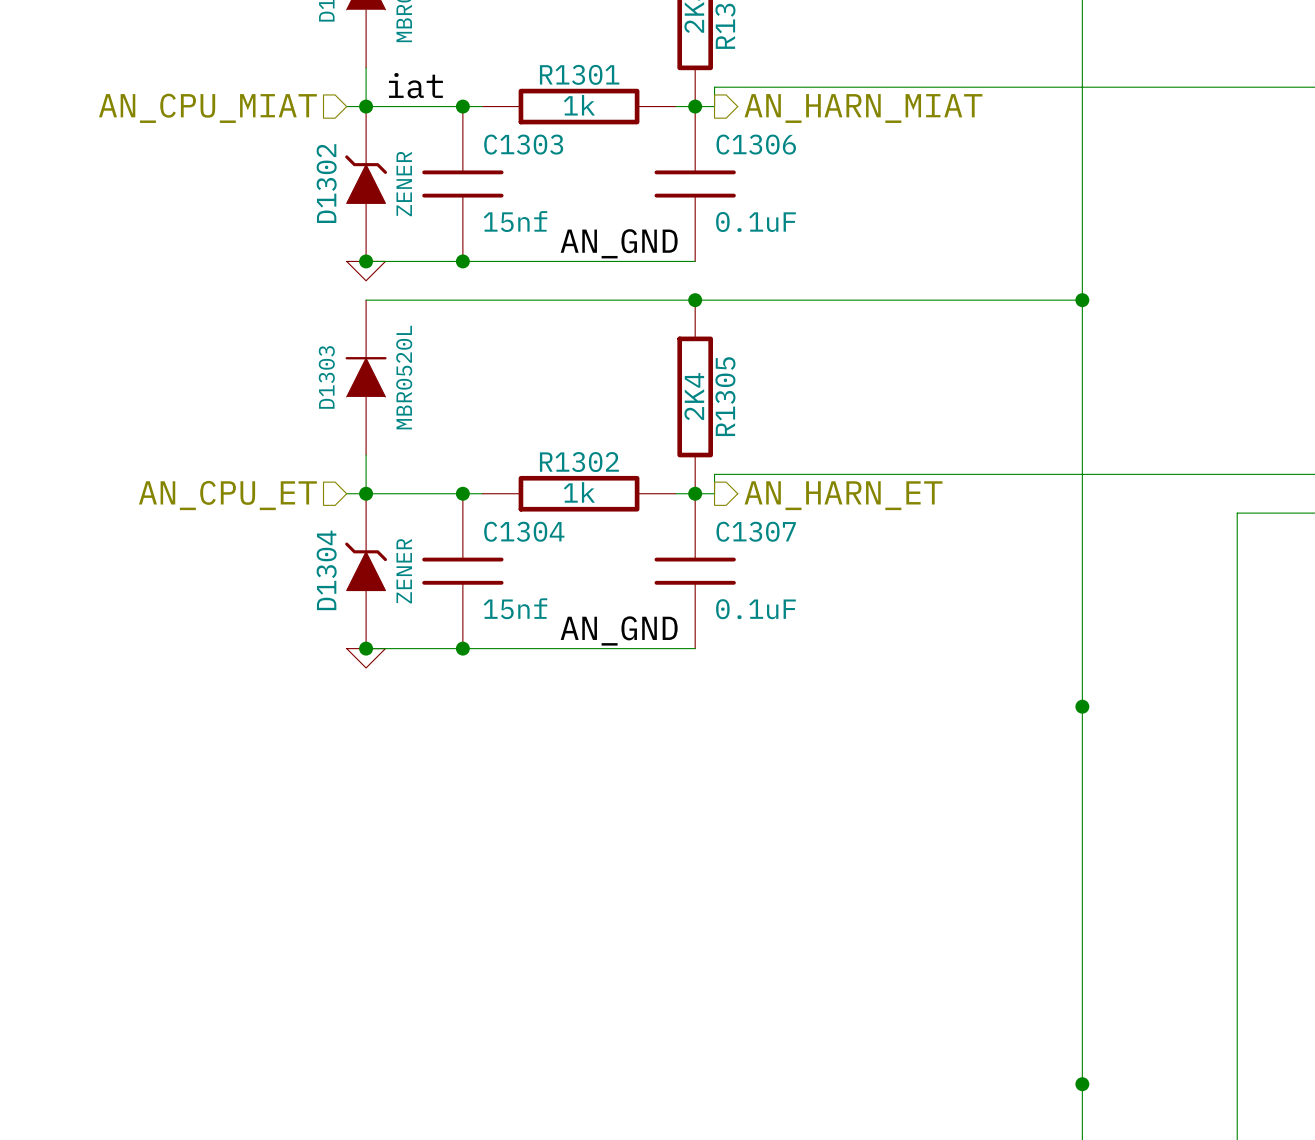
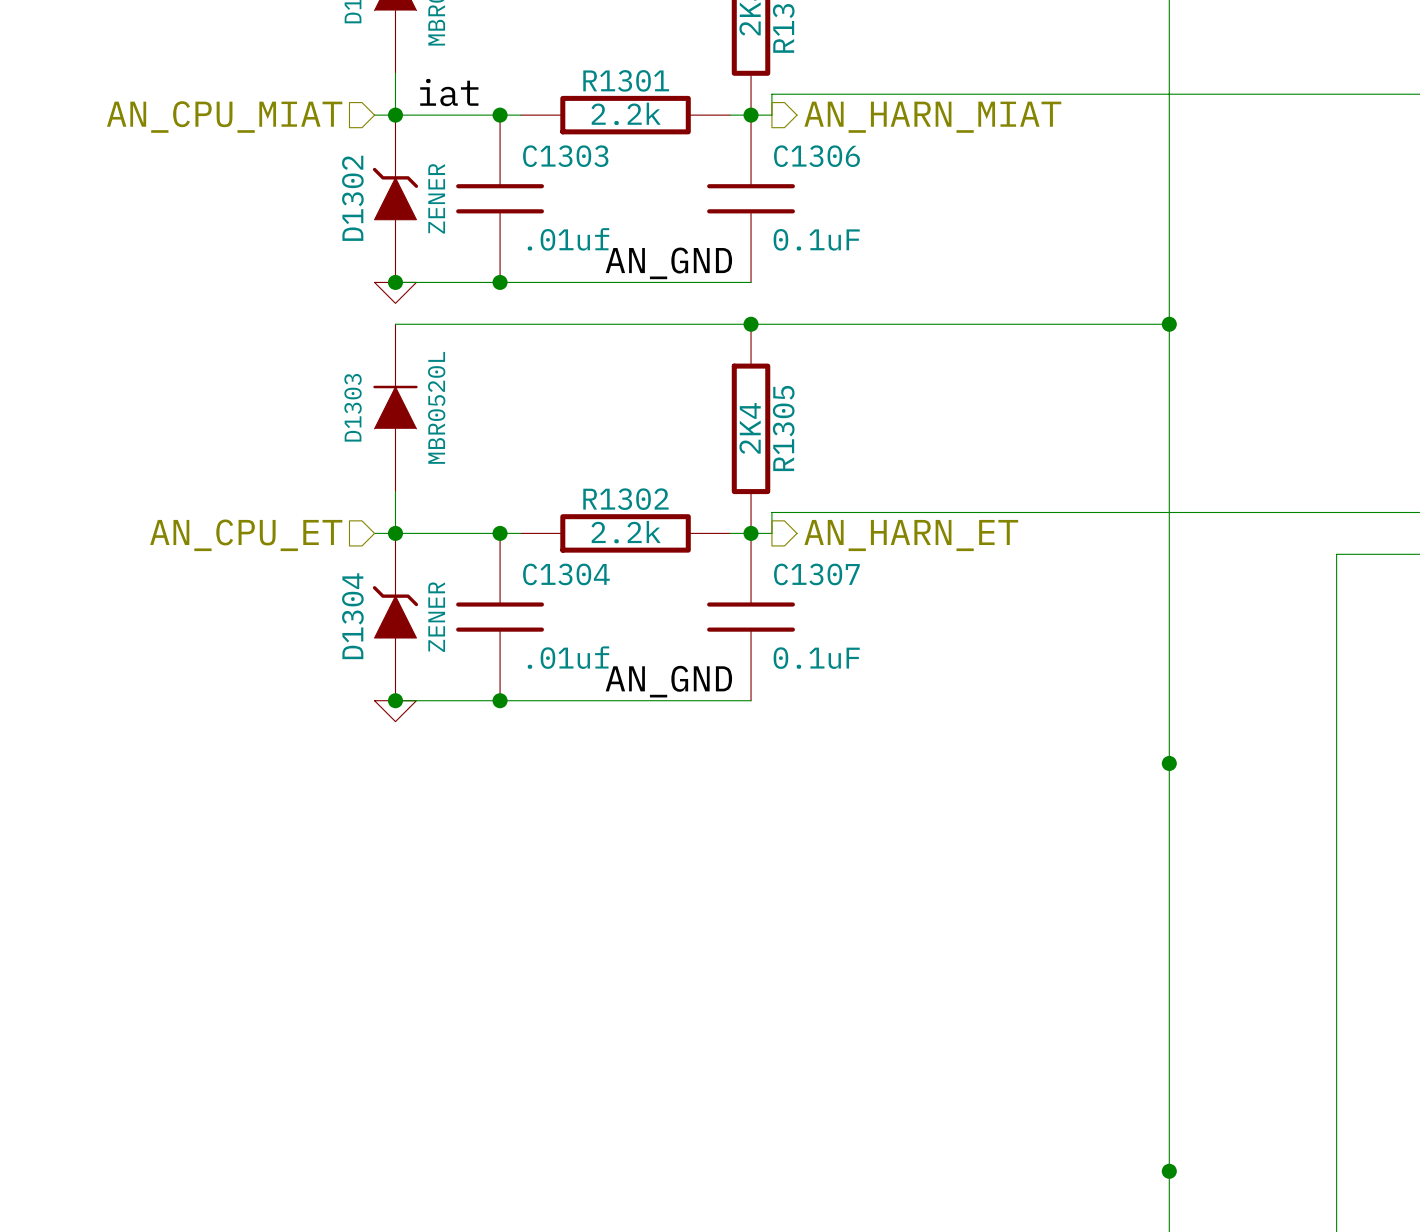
R1301 value: 1k (579, 105) -> 2.2k (626, 113)
C1303 value: 15nf (515, 221) -> .01uf (568, 239)
R1302 value: 1k (579, 492) -> 2.2k (626, 532)
C1304 value: 15nf (515, 608) -> .01uf (568, 657)

